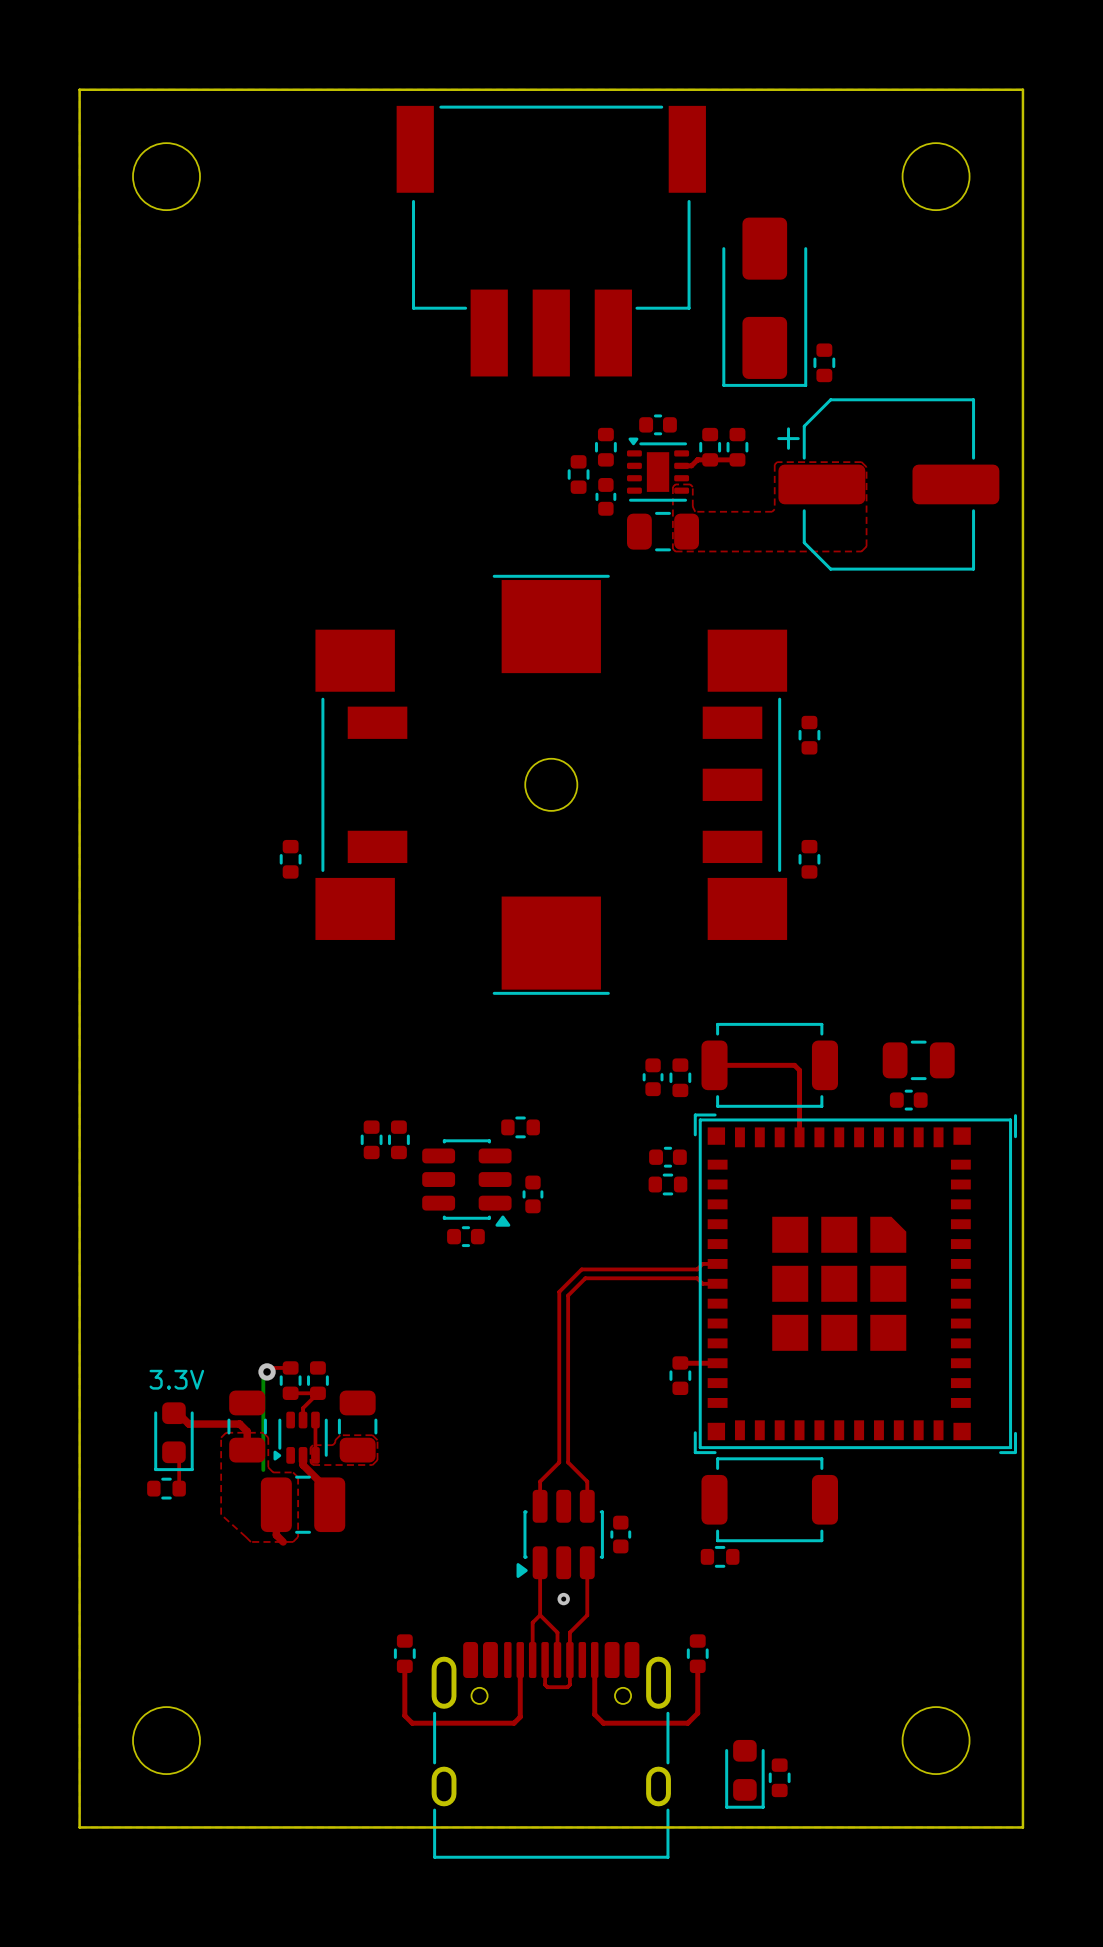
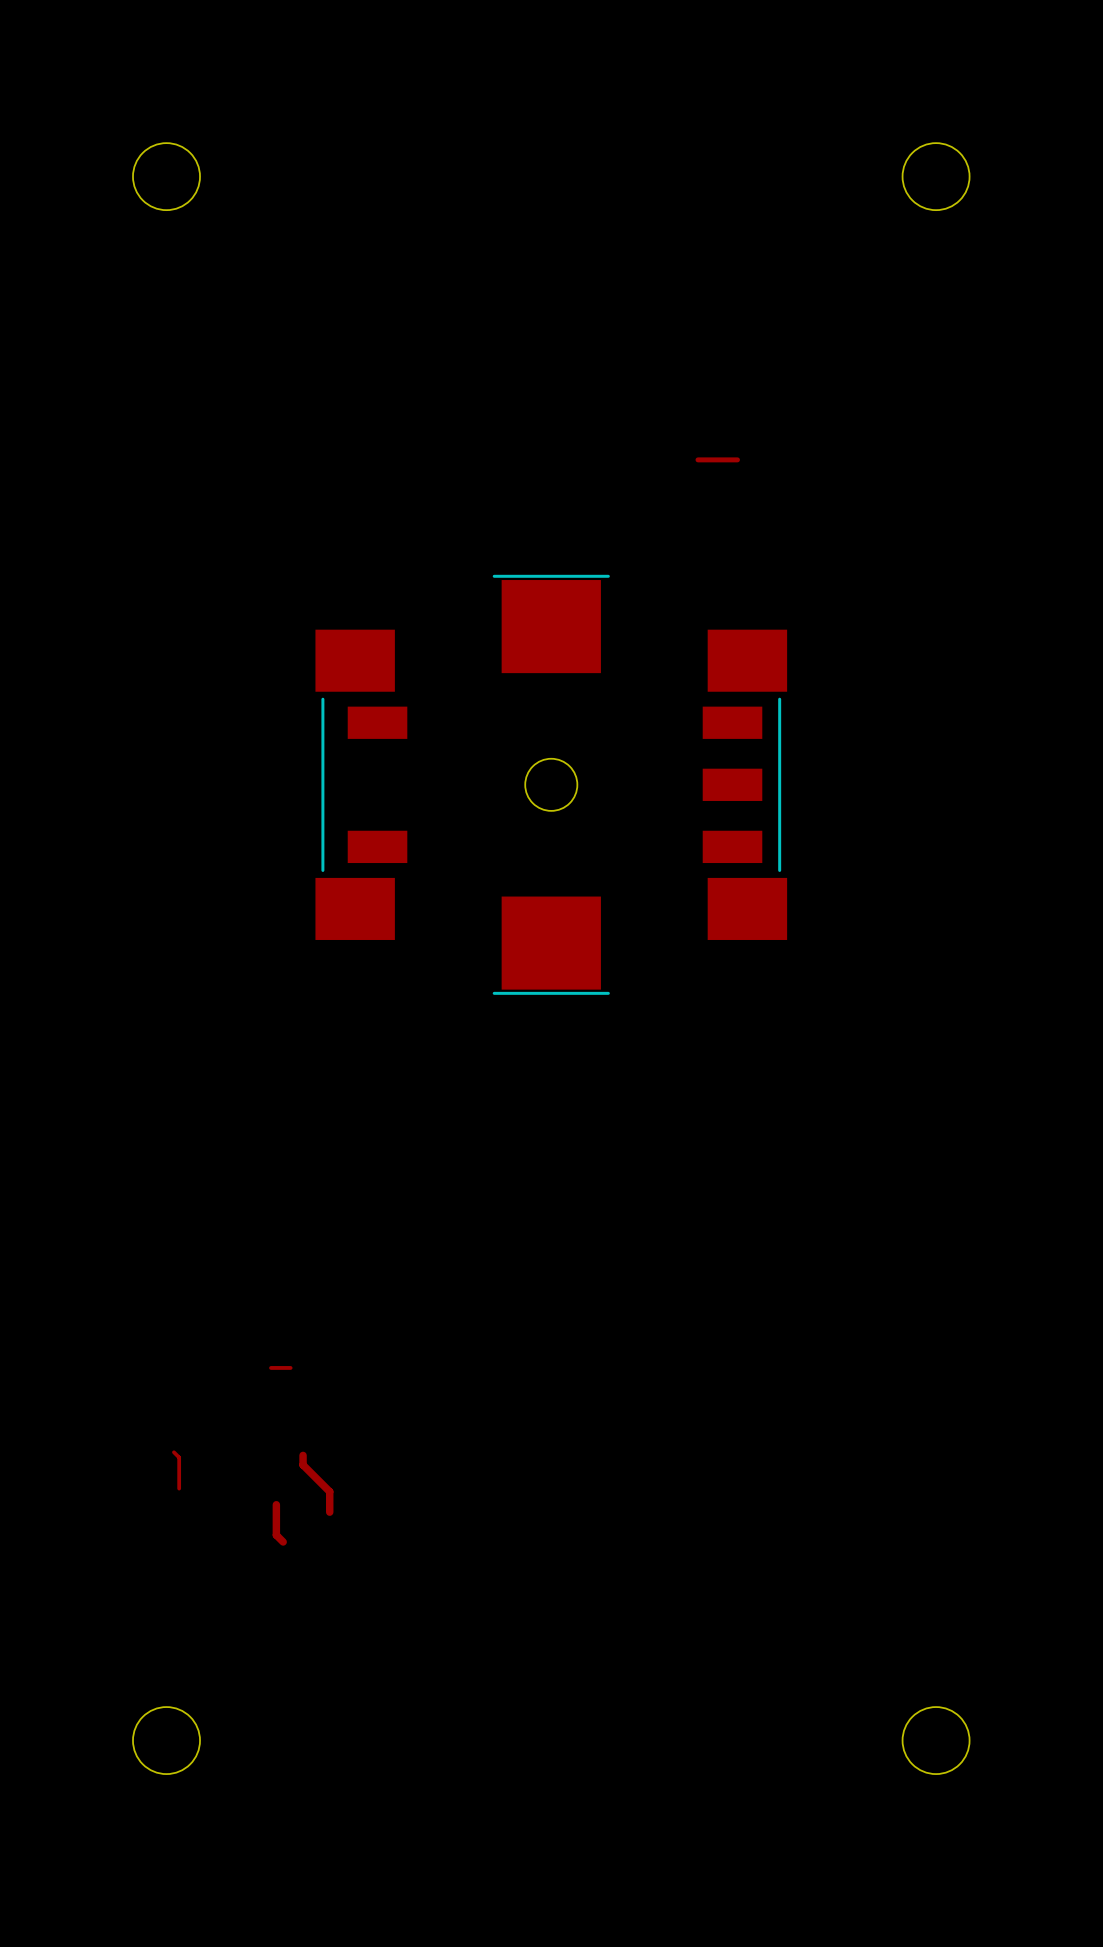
board edge: (79, 89) (1022, 89) (1022, 1827) (79, 1827) (79, 89) -> none
part: (551, 241) -> none
part: (764, 302) -> none
part: (824, 362) -> none
part: (658, 424) -> none
part: (605, 447) -> none
part: (710, 447) -> none
part: (737, 447) -> none
top track: (697, 459) (691, 465) (681, 465) -> none
top zone outline: (777, 462) (861, 462) (866, 467) (866, 546) (861, 551) (675, 551) (672, 548) (672, 486) (675, 484) (690, 484) (692, 486) (692, 506) (695, 511) (772, 511) (774, 509) (774, 464) (777, 462) -> none
part: (658, 469) -> none
part: (578, 474) -> none
part: (888, 484) -> none
part: (605, 496) -> none
part: (662, 531) -> none
part: (809, 735) -> none
part: (290, 859) -> none
part: (809, 859) -> none
part: (918, 1060) -> none
top track: (714, 1065) (794, 1065) (799, 1070) (799, 1137) -> none
part: (769, 1065) -> none
part: (653, 1077) -> none
part: (680, 1077) -> none
part: (908, 1100) -> none
part: (520, 1127) -> none
part: (371, 1139) -> none
part: (398, 1139) -> none
part: (667, 1157) -> none
part: (466, 1183) -> none
part: (667, 1184) -> none
part: (532, 1194) -> none
part: (465, 1236) -> none
top track: (717, 1263) (702, 1263) (697, 1269) (581, 1269) (559, 1291) (559, 1462) (540, 1481) (540, 1506) -> none
top track: (717, 1283) (702, 1283) (697, 1278) (585, 1278) (568, 1295) (568, 1462) (587, 1481) (587, 1506) -> none
part: (855, 1283) -> none
top track: (680, 1363) (717, 1363) -> none
bottom track: (270, 1368) (263, 1375) (263, 1469) -> none
via: (267, 1371) -> none
part: (680, 1375) -> none
text: 3.3V (176, 1379) -> none
part: (290, 1380) -> none
part: (317, 1380) -> none
top track: (290, 1393) (317, 1393) (303, 1408) (303, 1420) -> none
top track: (173, 1413) (177, 1413) (188, 1424) (239, 1424) (247, 1431) (247, 1450) -> none
top track: (315, 1420) (315, 1455) -> none
part: (247, 1426) -> none
part: (357, 1426) -> none
top zone outline: (226, 1432) (263, 1432) (268, 1437) (268, 1467) (273, 1472) (293, 1472) (298, 1477) (298, 1537) (293, 1541) (250, 1541) (221, 1514) (221, 1437) (226, 1432) -> none
top zone outline: (340, 1435) (372, 1435) (377, 1440) (377, 1460) (372, 1465) (312, 1465) (310, 1462) (310, 1447) (312, 1445) (332, 1445) (340, 1435) -> none
part: (173, 1436) -> none
part: (300, 1437) -> none
part: (166, 1488) -> none
part: (769, 1499) -> none
part: (303, 1504) -> none
part: (560, 1534) -> none
part: (620, 1534) -> none
part: (720, 1556) -> none
top track: (540, 1562) (540, 1615) -> none
top track: (587, 1562) (587, 1615) (569, 1632) (569, 1684) (567, 1687) (547, 1687) (545, 1684) (545, 1660) -> none
via: (563, 1599) -> none
top track: (540, 1615) (532, 1622) (532, 1660) -> none
top track: (540, 1615) (557, 1632) (557, 1660) -> none
part: (404, 1653) -> none
part: (697, 1653) -> none
top track: (520, 1660) (520, 1716) (514, 1723) (412, 1723) (404, 1715) (404, 1666) -> none
top track: (594, 1660) (594, 1714) (603, 1723) (687, 1723) (697, 1713) (697, 1666) -> none
part: (551, 1750) -> none
part: (744, 1774) -> none
part: (779, 1777) -> none

